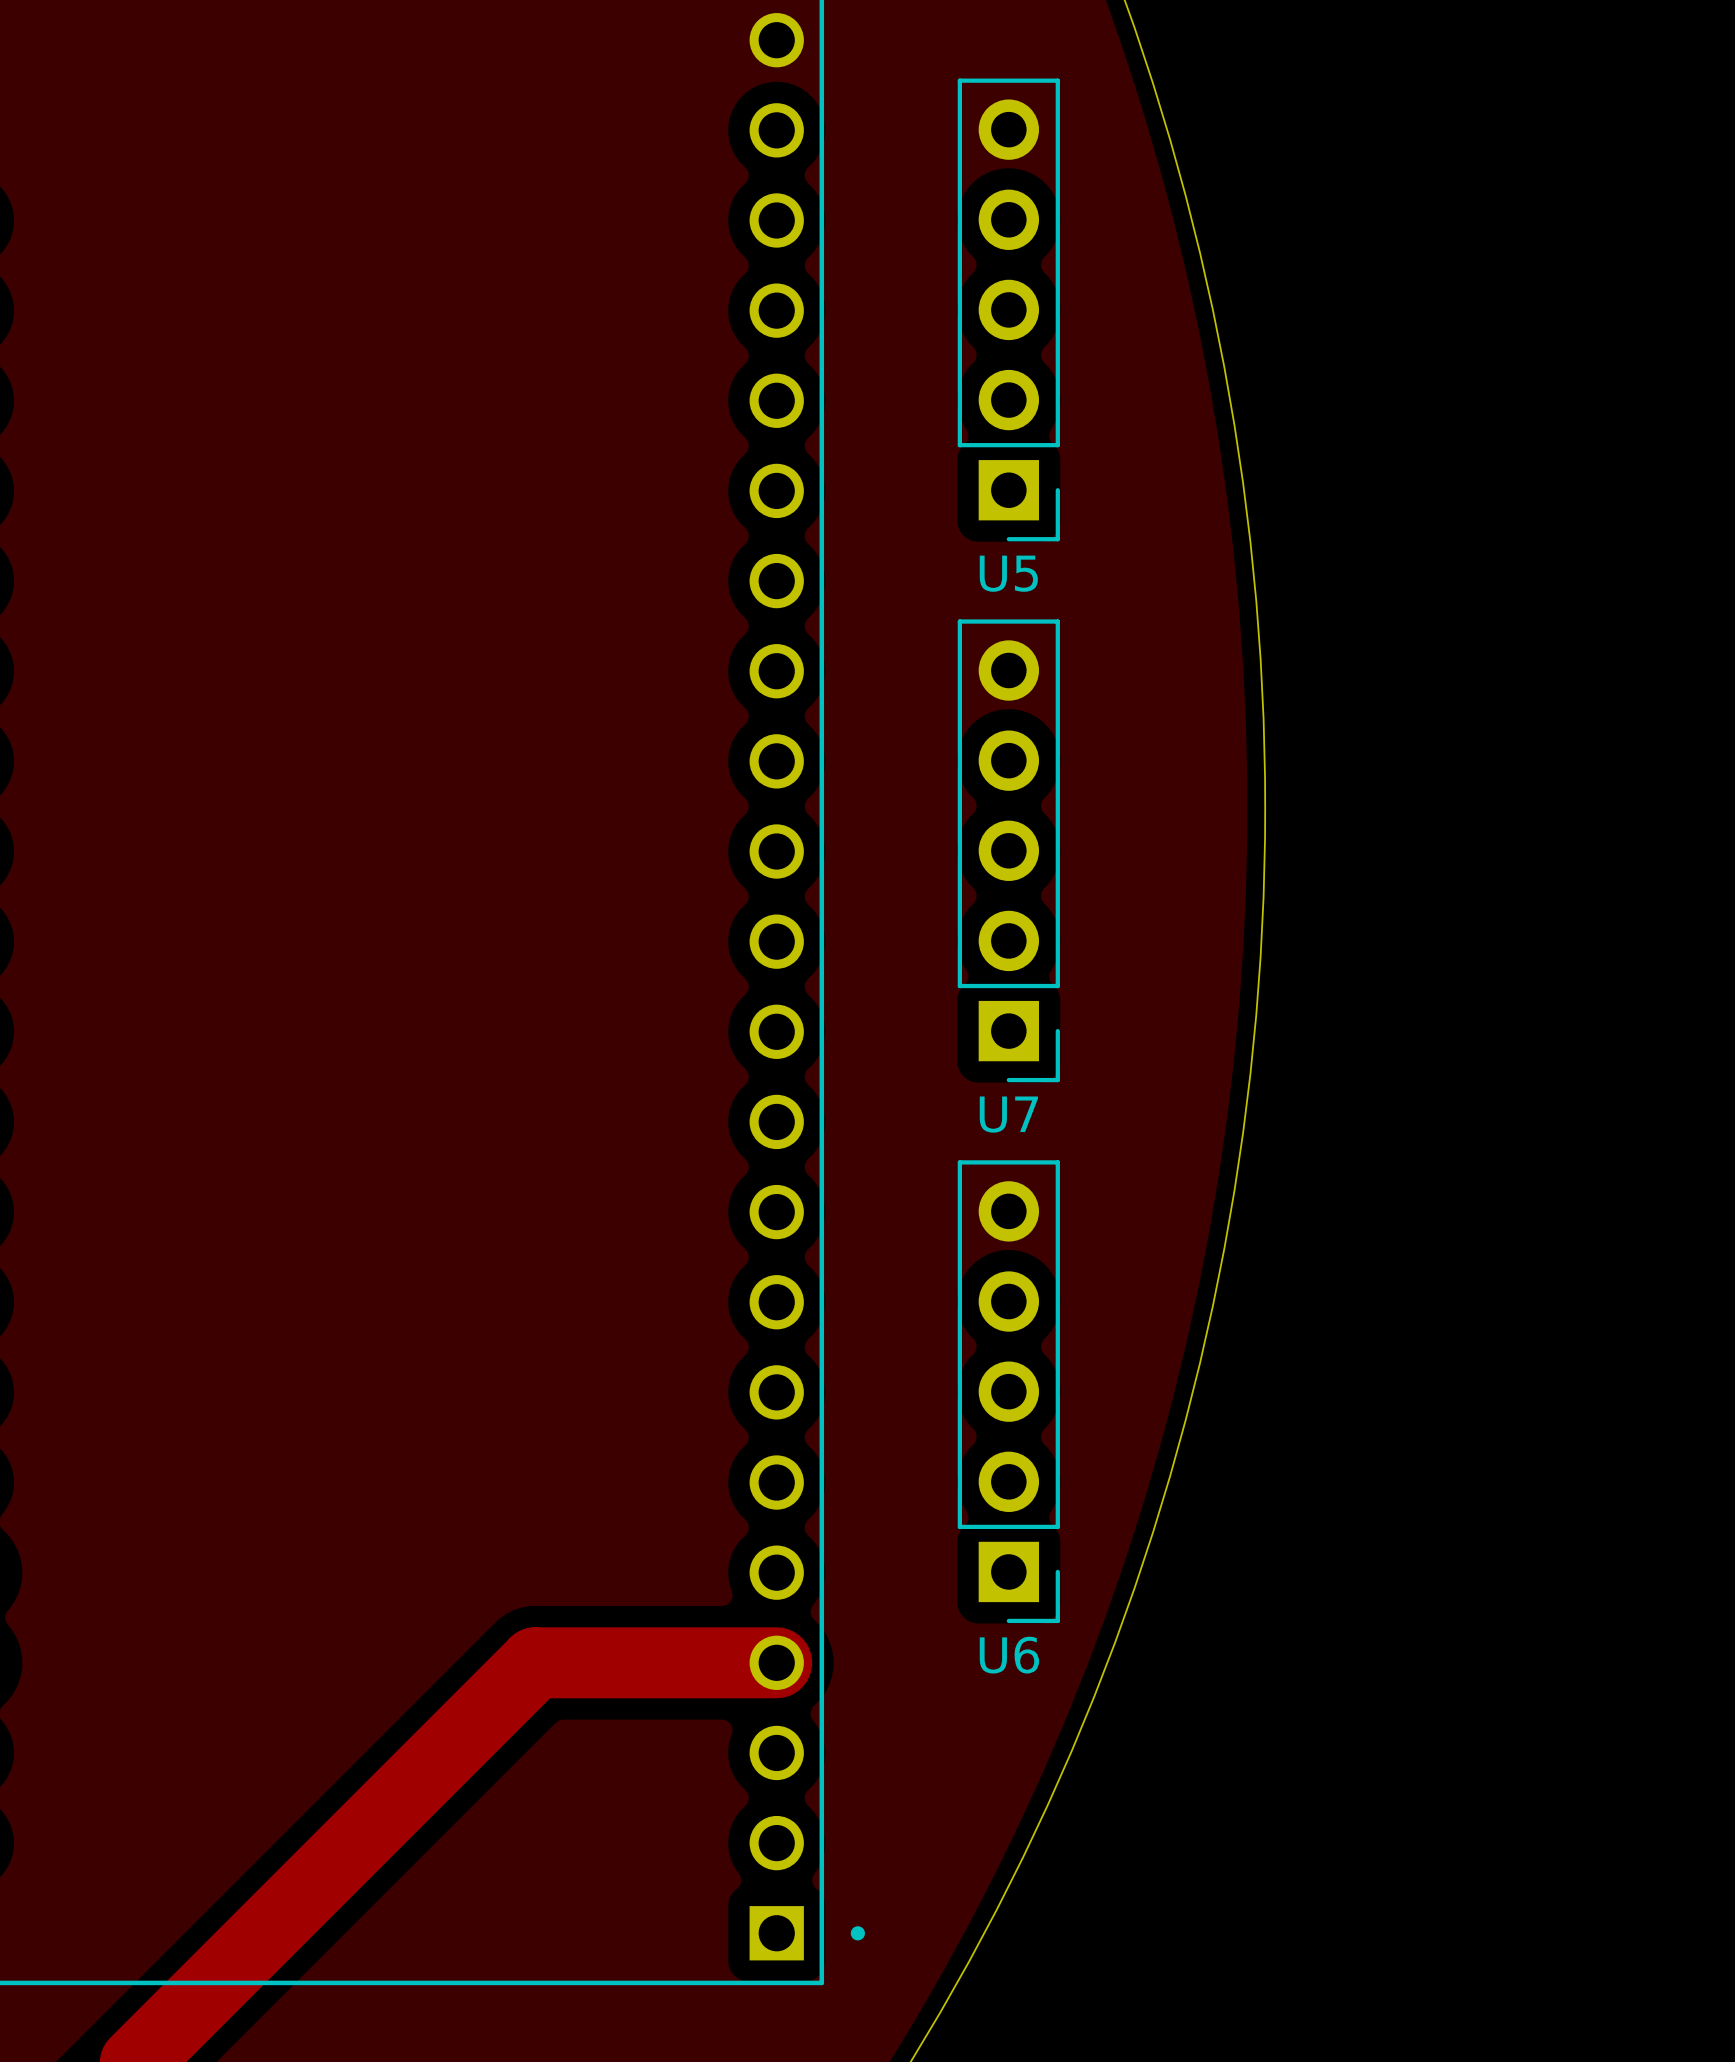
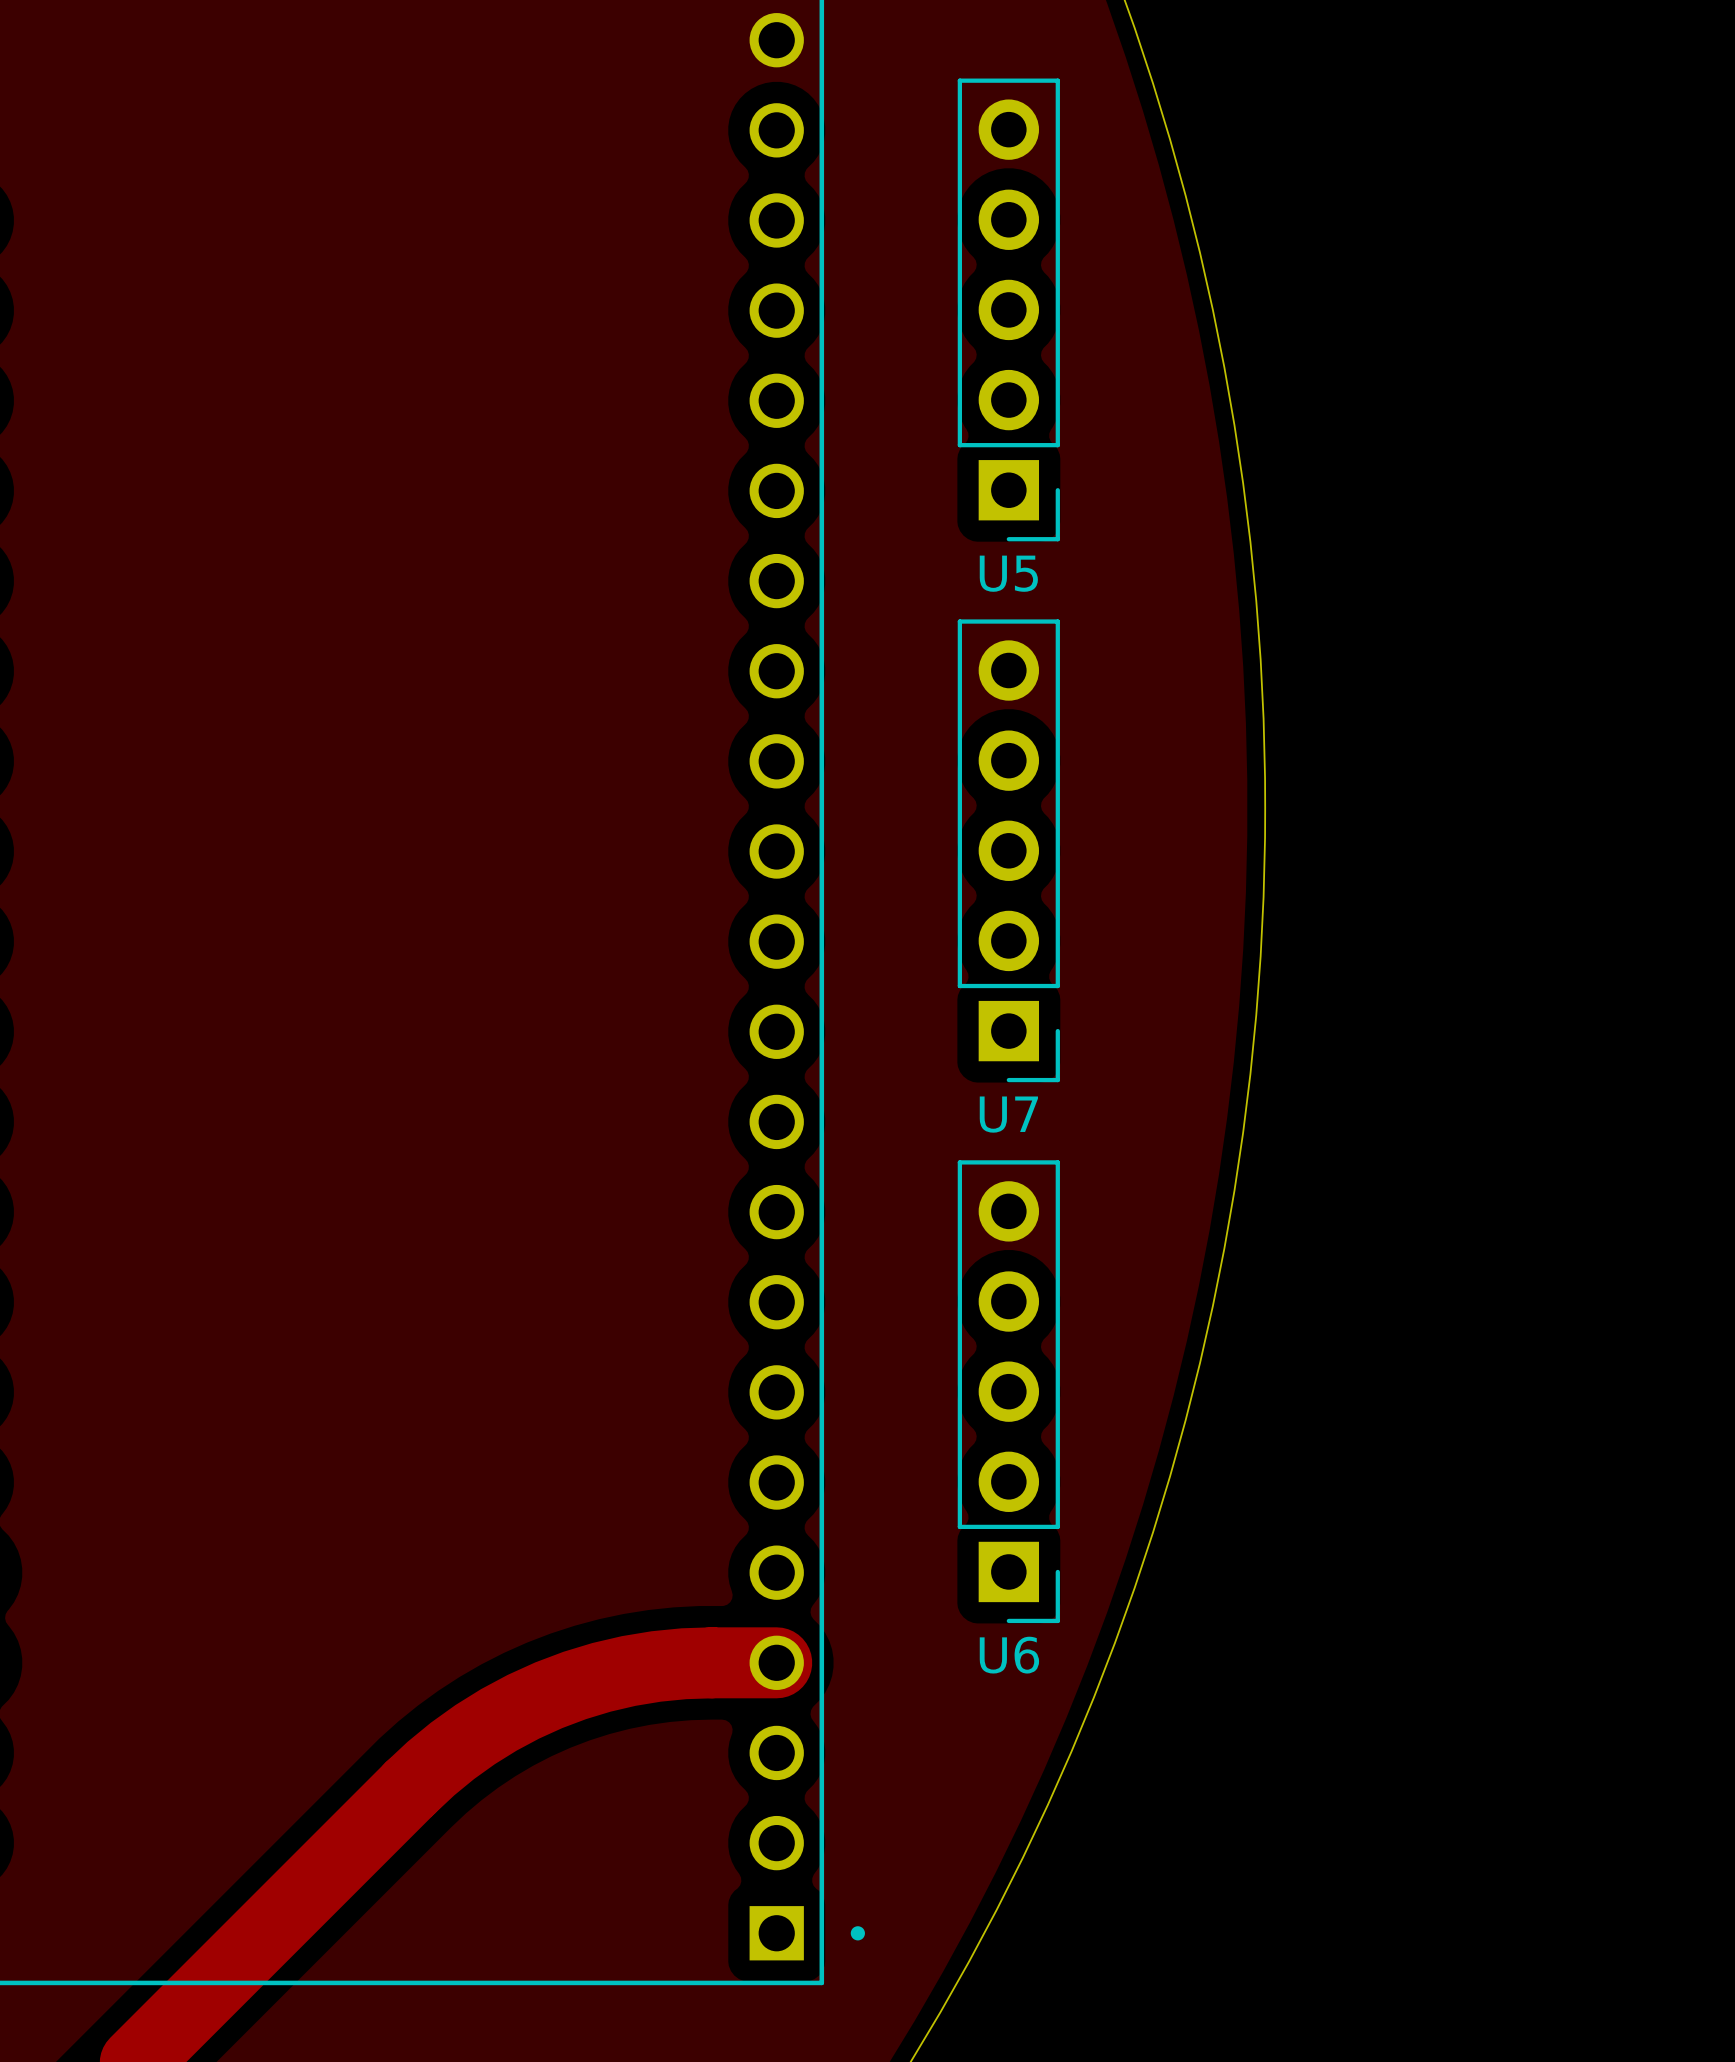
track: (711, 1662) (535, 1662) (410, 1787) -> (711, 1662) (656, 1666) (628, 1671) (574, 1685) (548, 1695) (498, 1719) (475, 1734) (452, 1750) (410, 1787)

